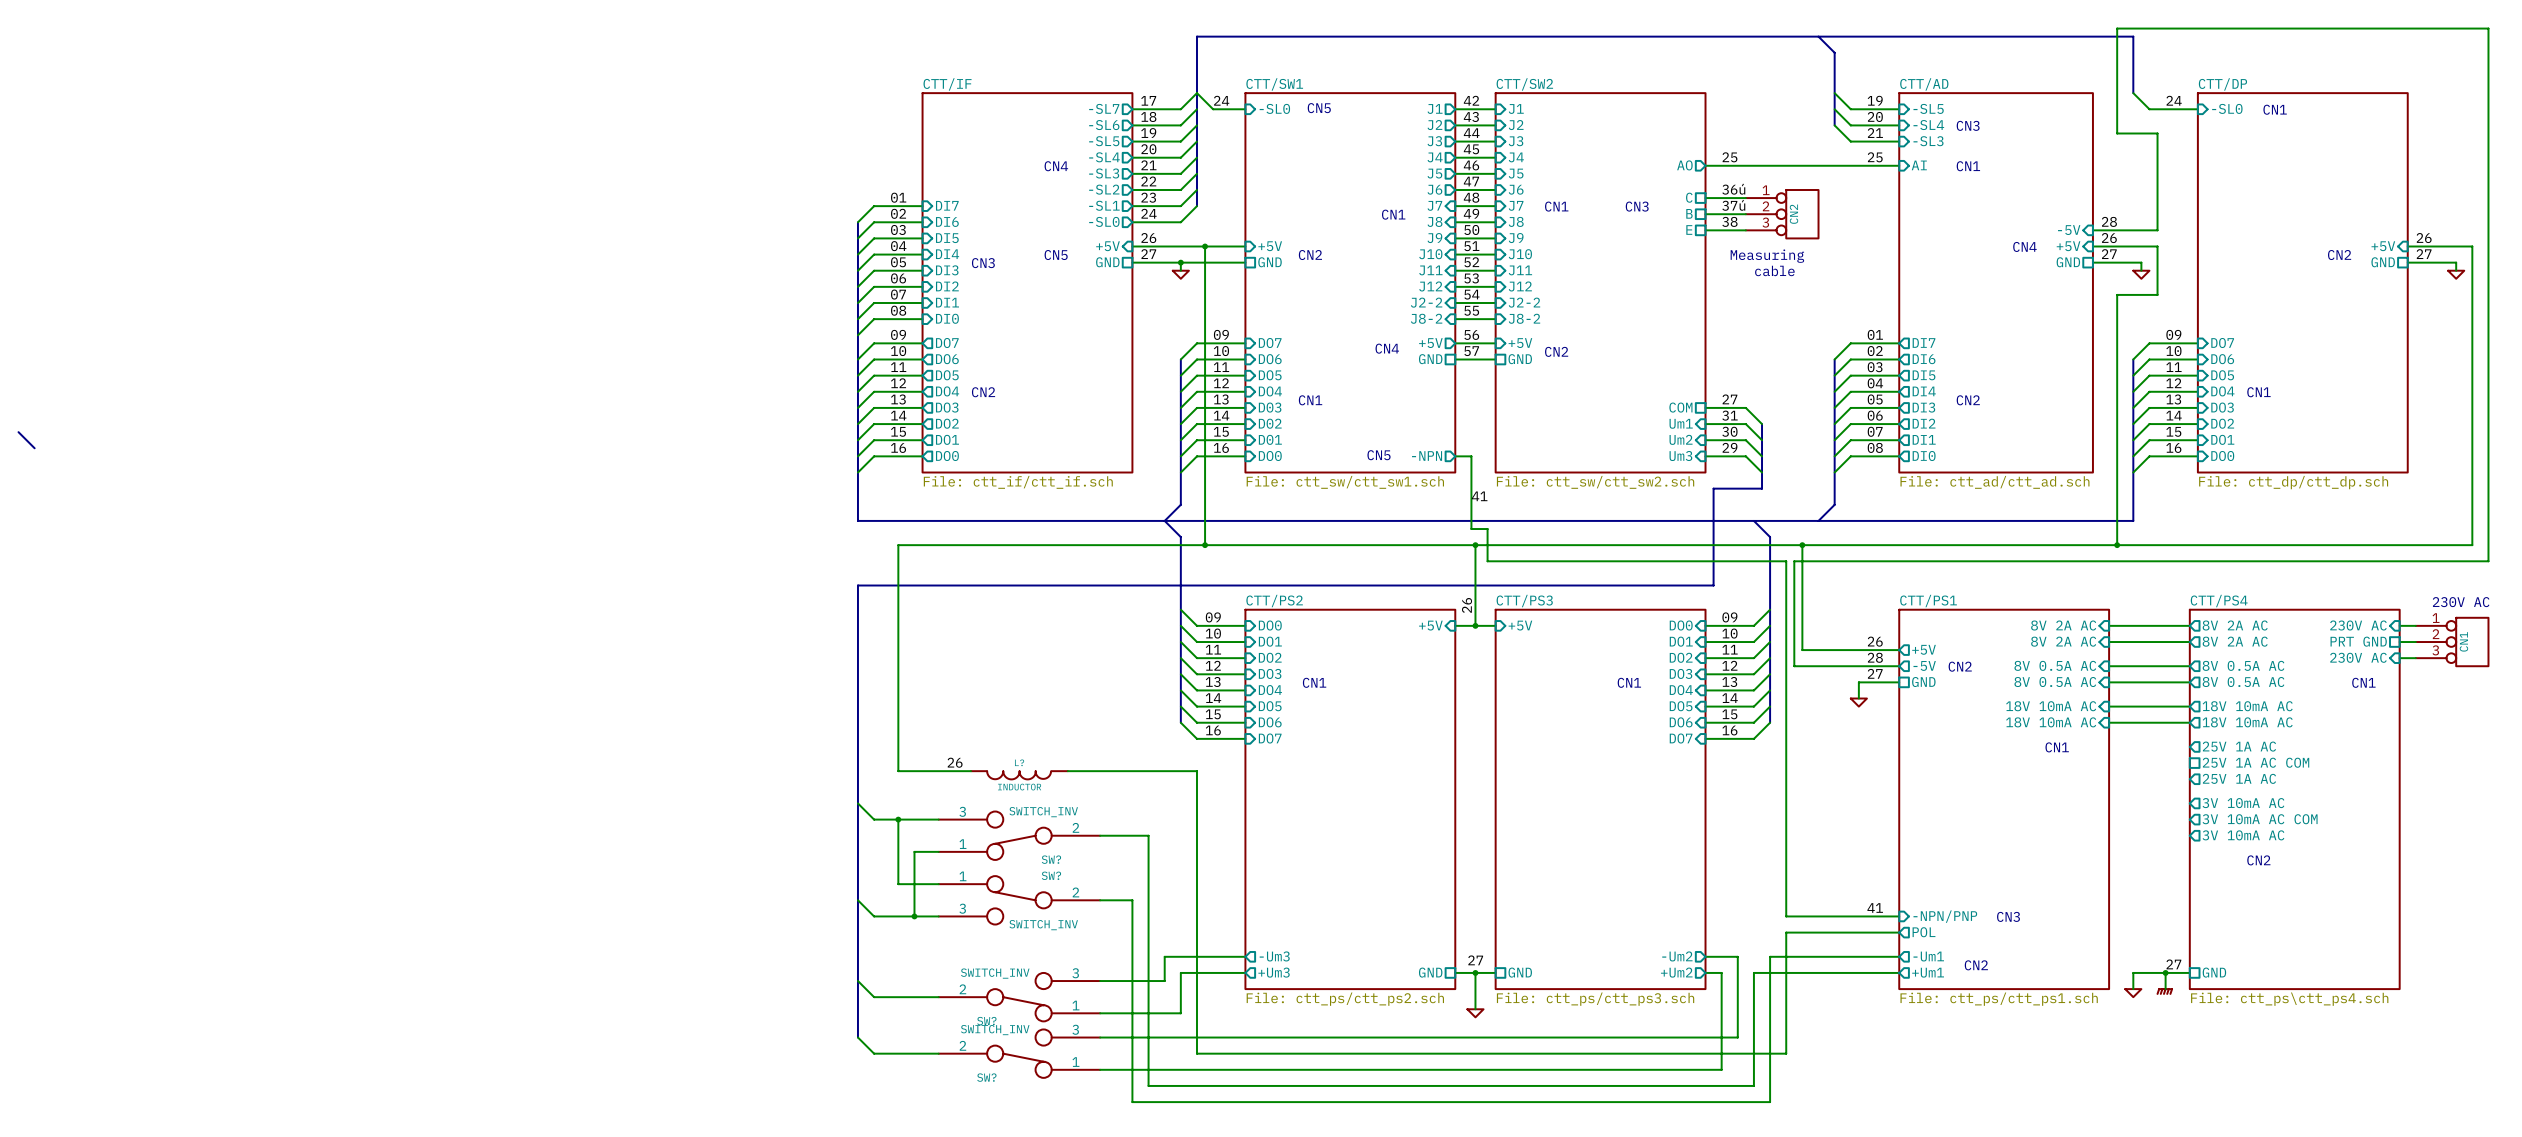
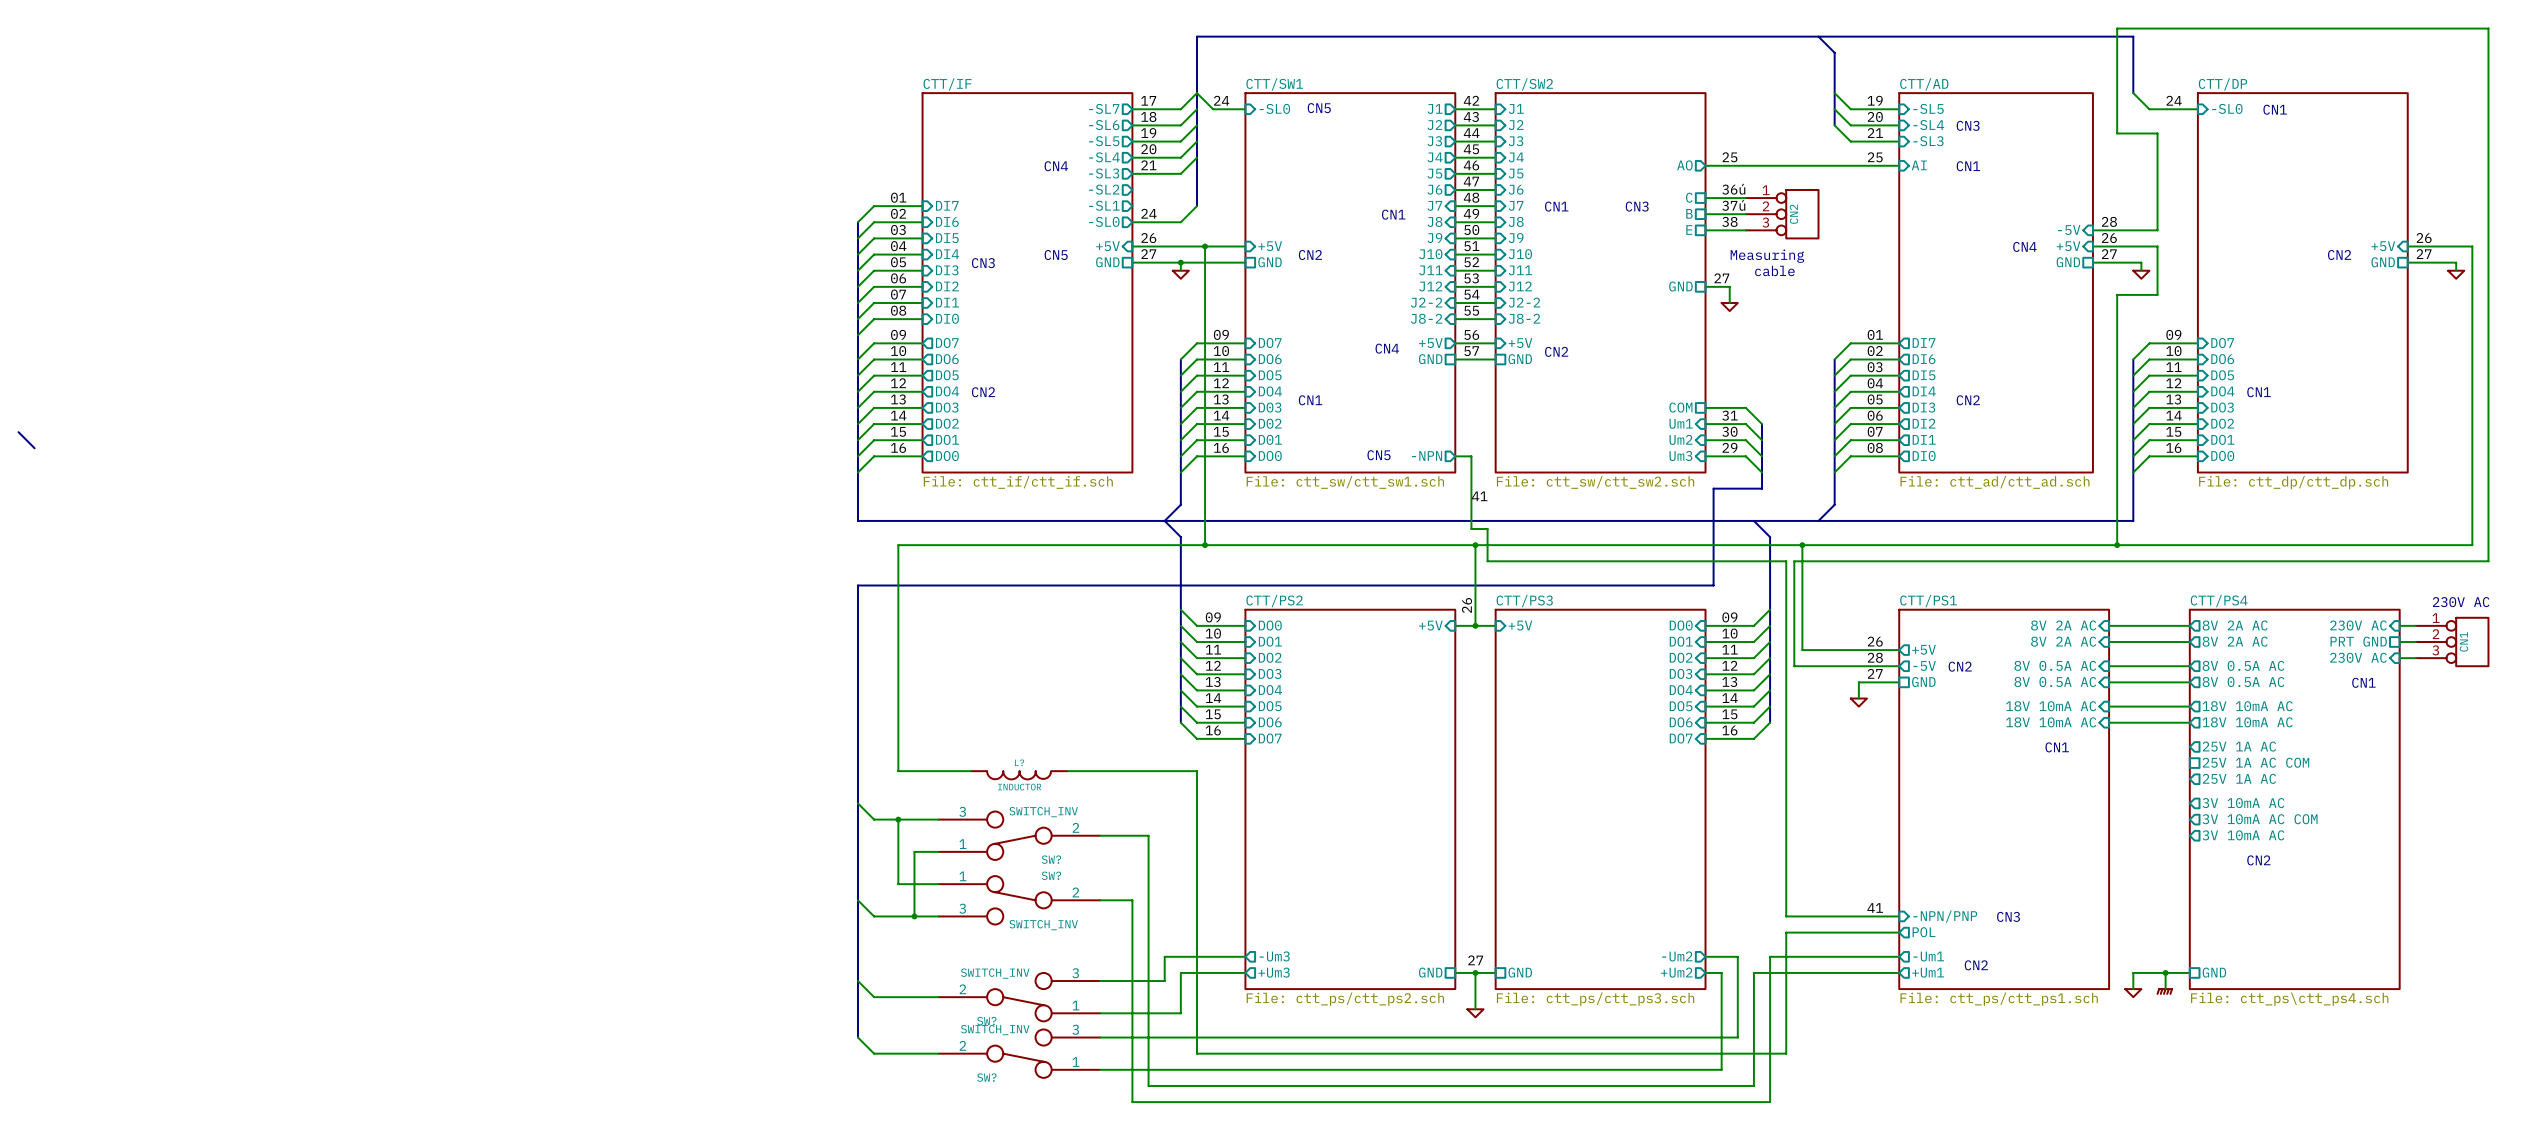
wire: (1196, 173) (1180, 189) (1132, 189) -> none
label: 22 (1148, 181) -> none
wire: (1196, 189) (1180, 206) (1132, 206) -> none
label: 23 (1148, 197) -> none
sheet pin: none -> GND (1680, 286)
wire: none -> (1705, 286) (1729, 286) (1729, 303)
power symbol: none -> (1729, 307)
label position: 27 (1729, 399) -> 27 (1721, 278)
text: CN1 (1314, 682) -> none
text: CN1 (1629, 682) -> none
label: 26 (955, 762) -> none
label: 27 (2173, 964) -> none

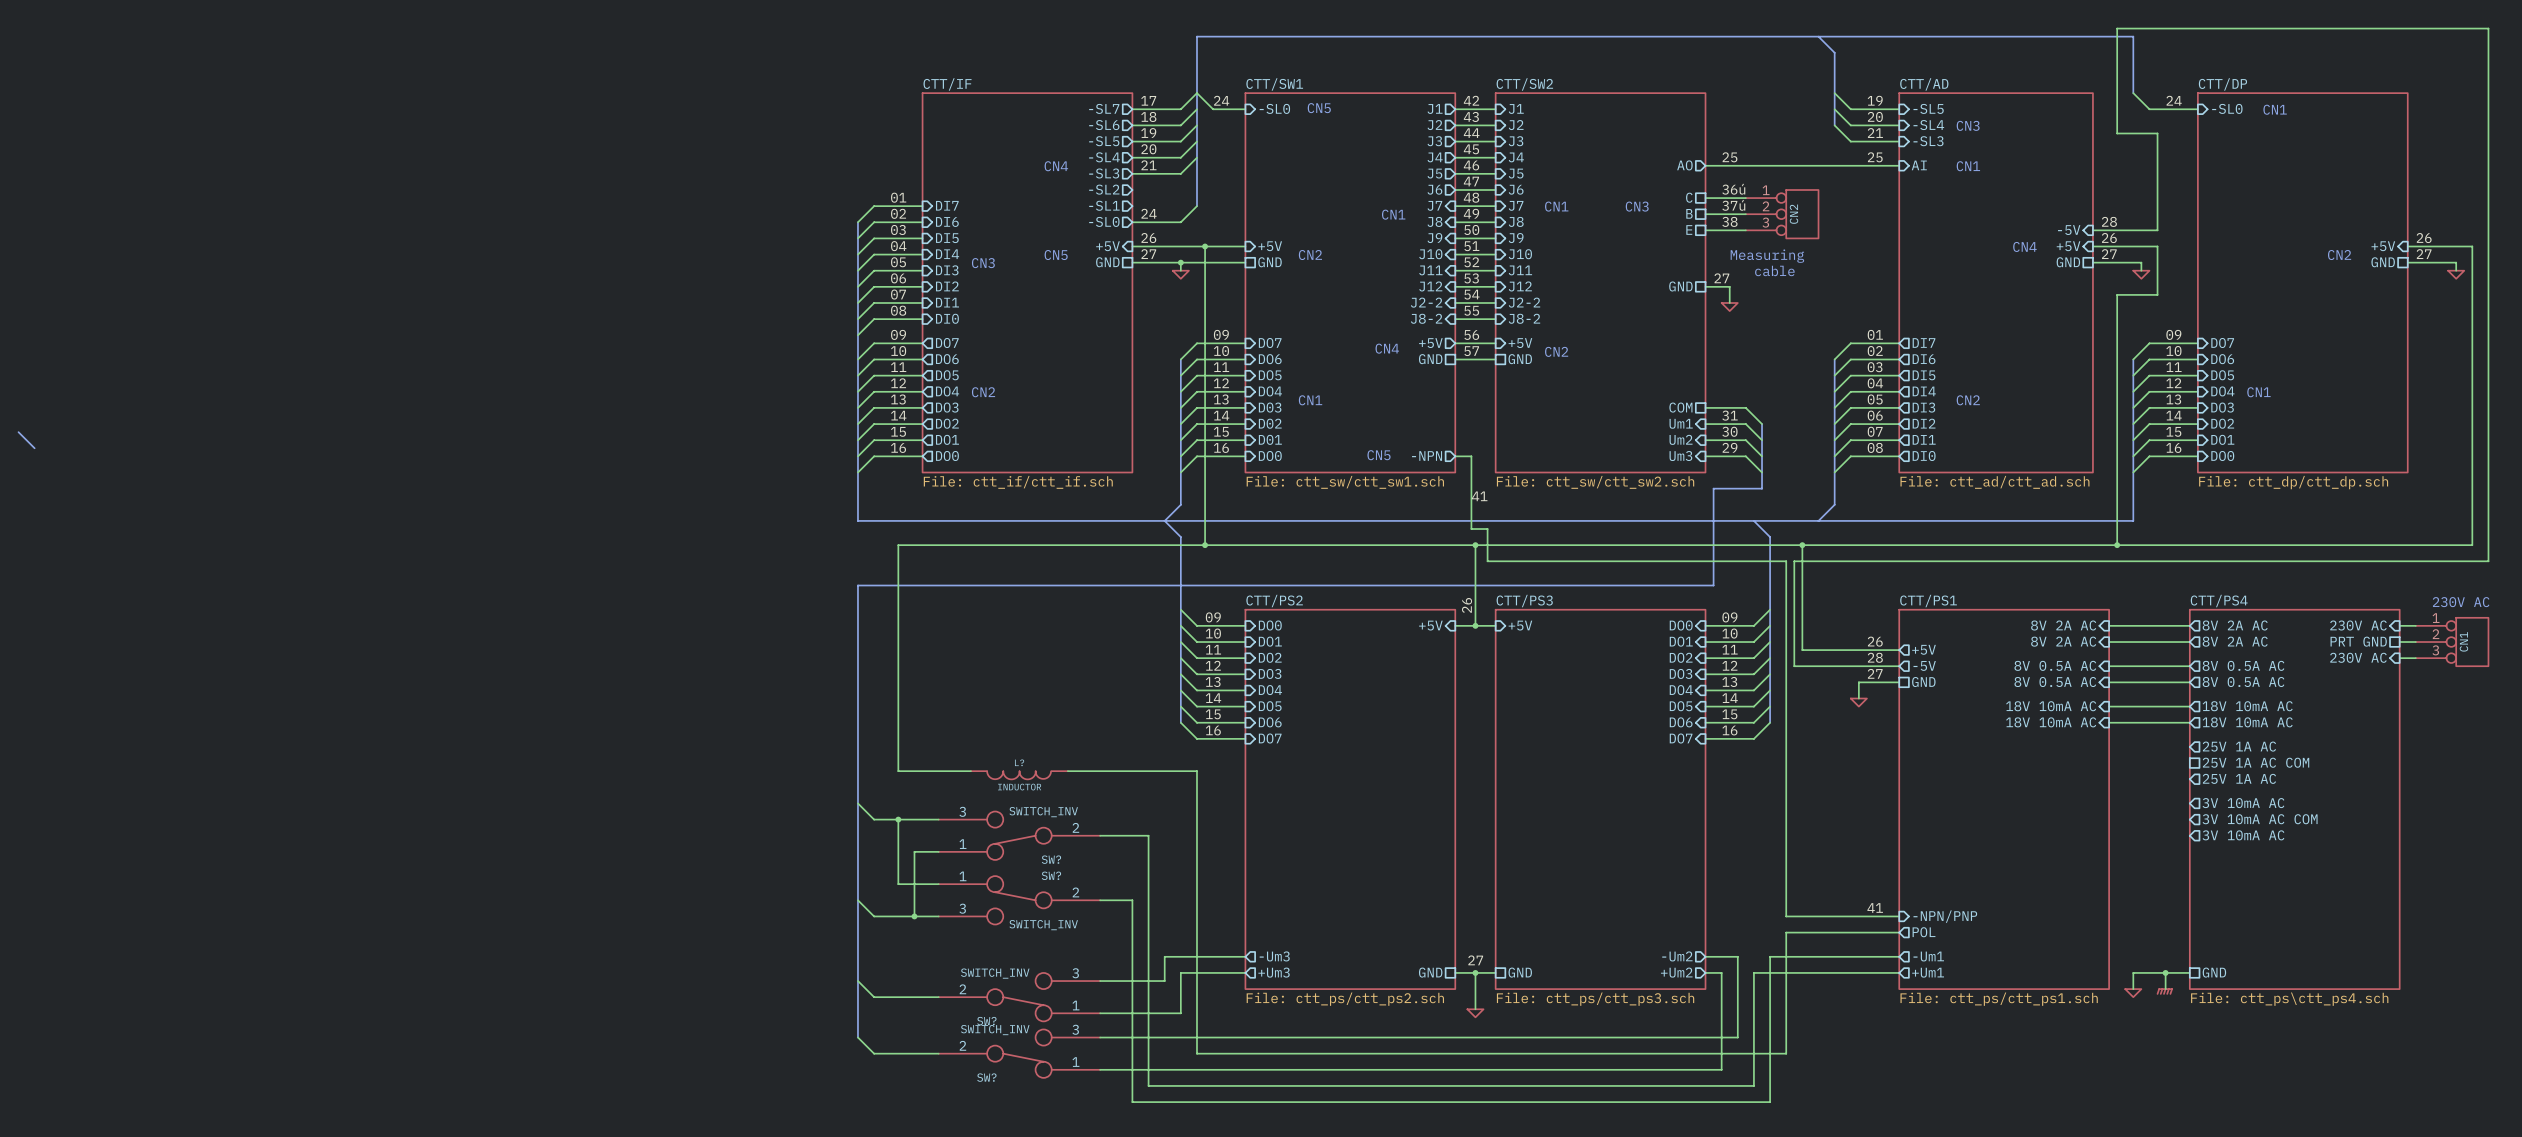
text: CN2 (1960, 666) -> none
text: CN1 (2363, 682) -> none
text: CN1 (2057, 747) -> none
text: CN2 (2258, 860) -> none
text: CN3 (2008, 916) -> none
text: CN2 (1976, 965) -> none

